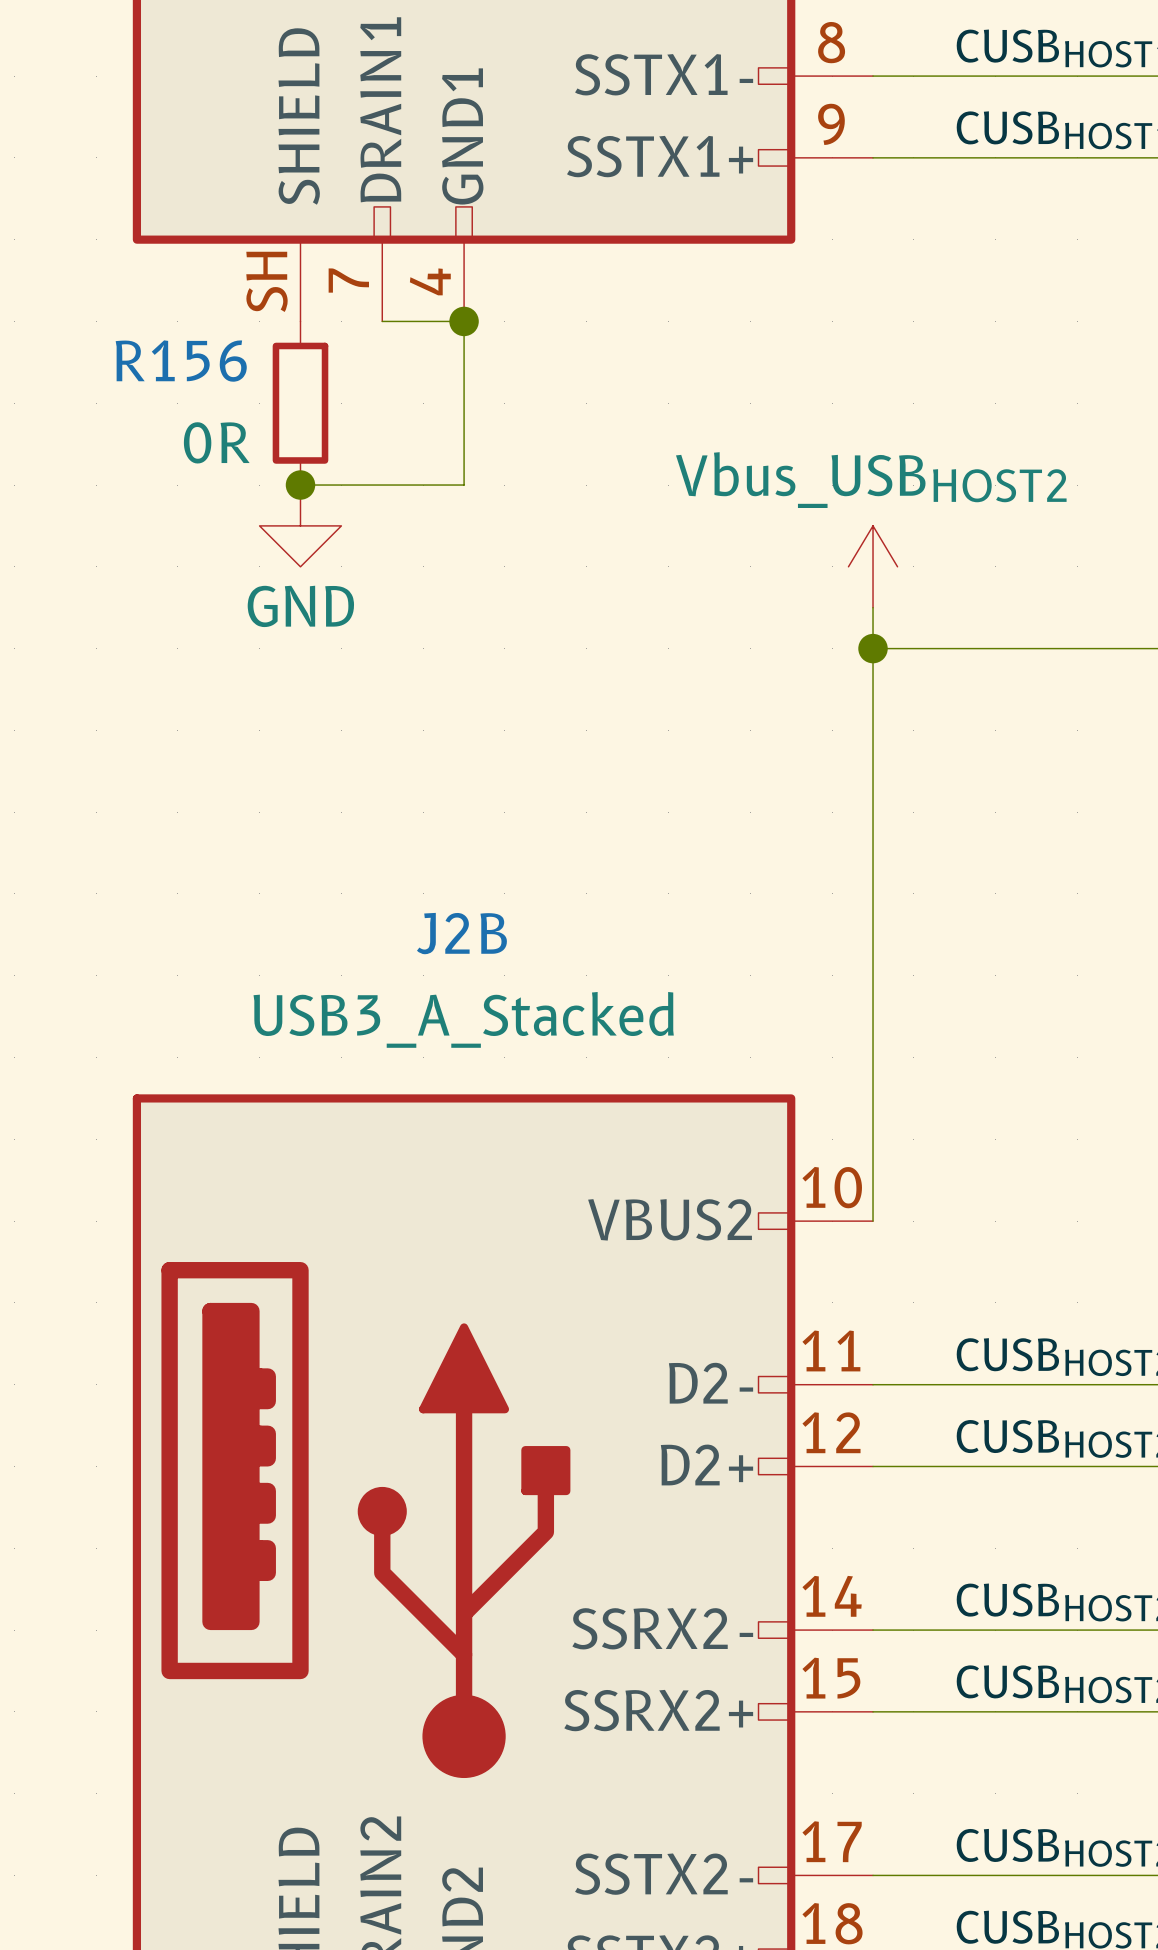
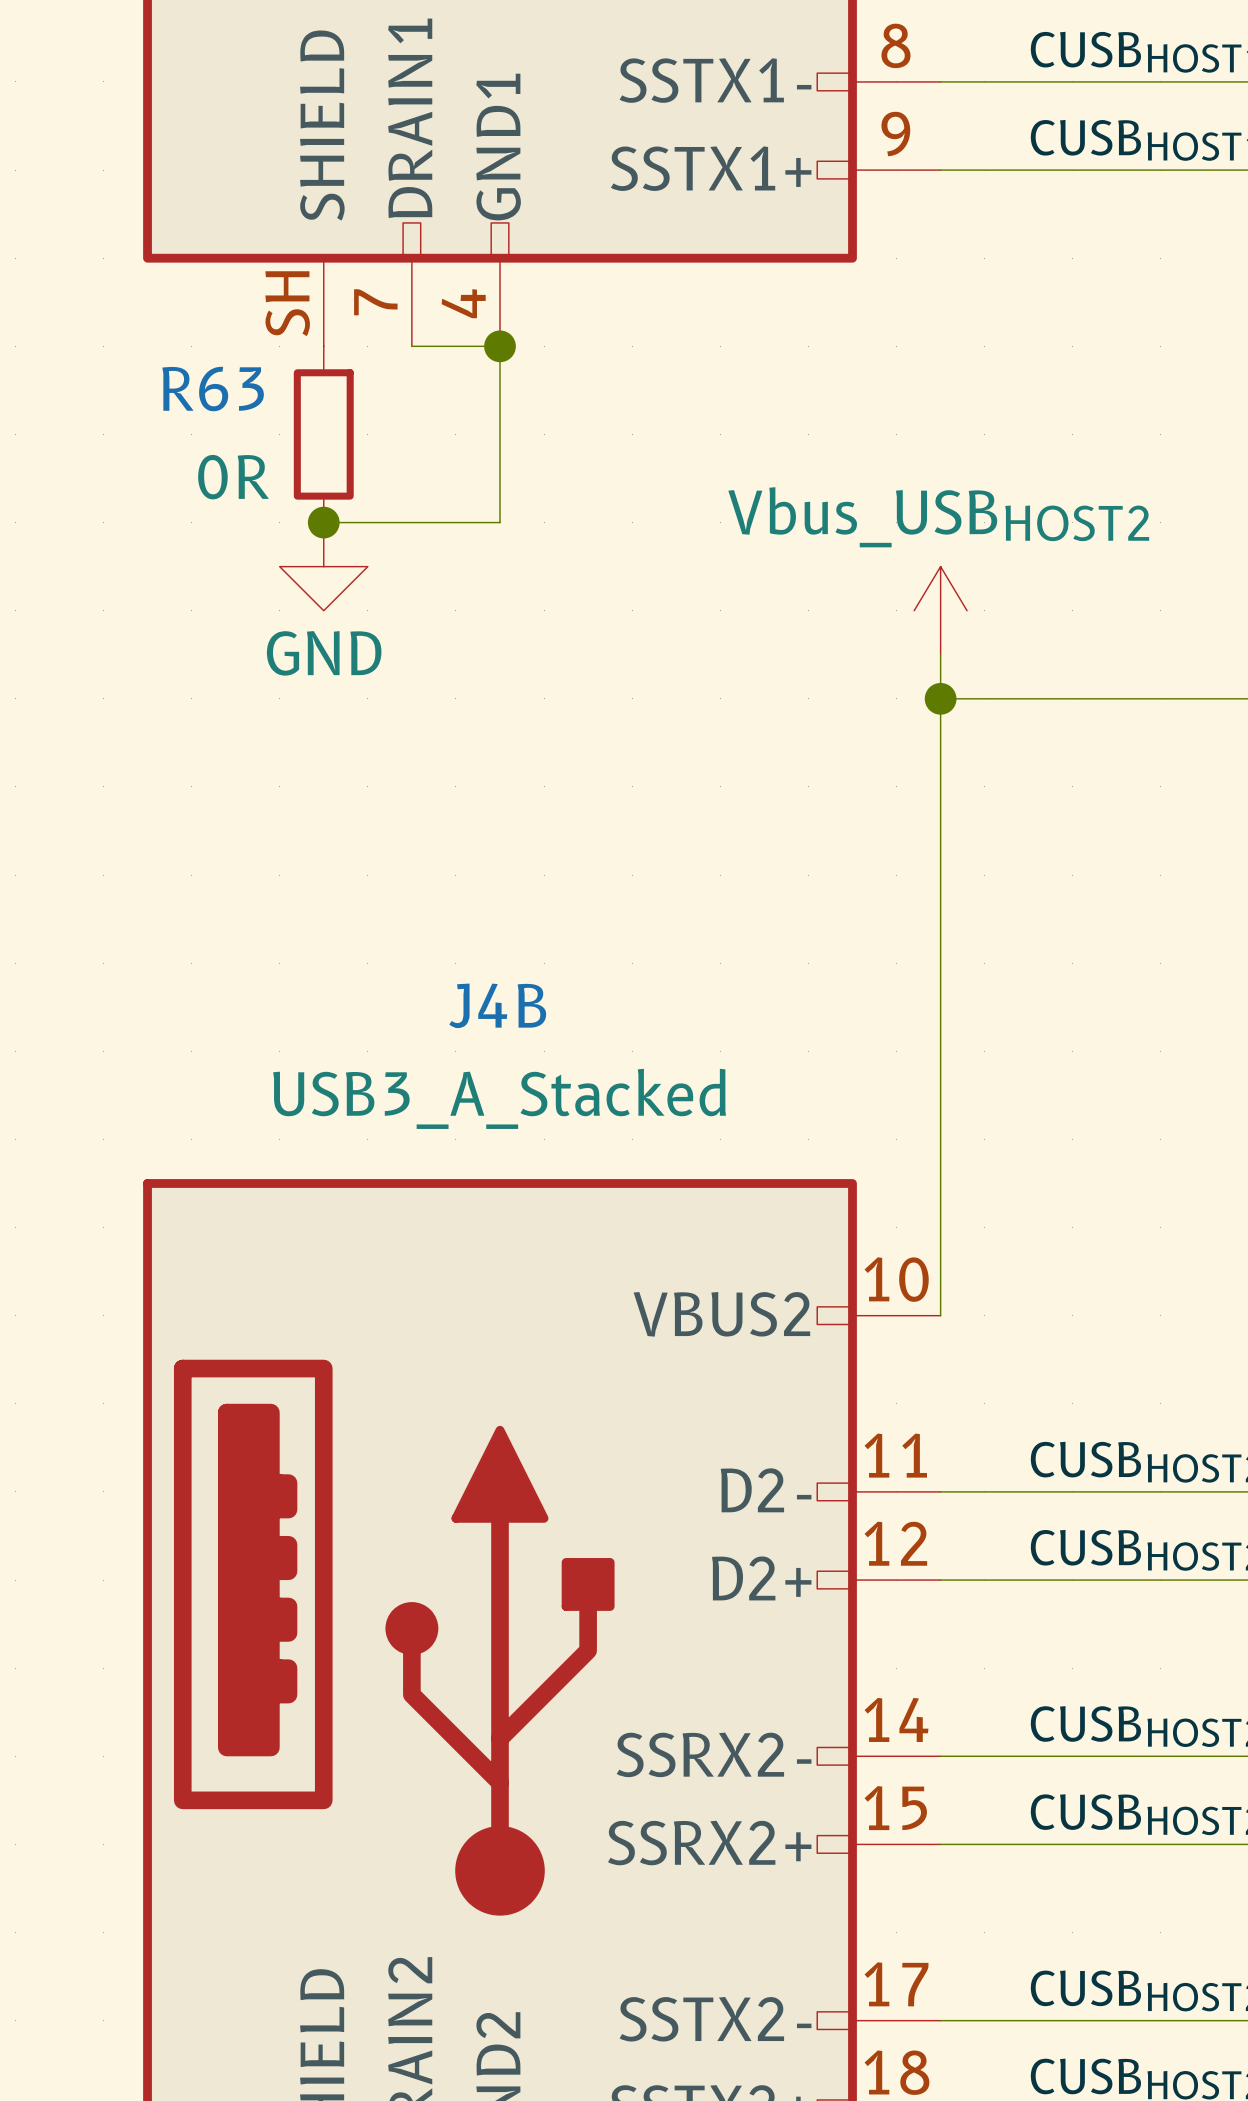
R156 name: R156 (181, 361) -> R63 (213, 389)
J2B name: J2B (461, 933) -> J4B (497, 1005)

